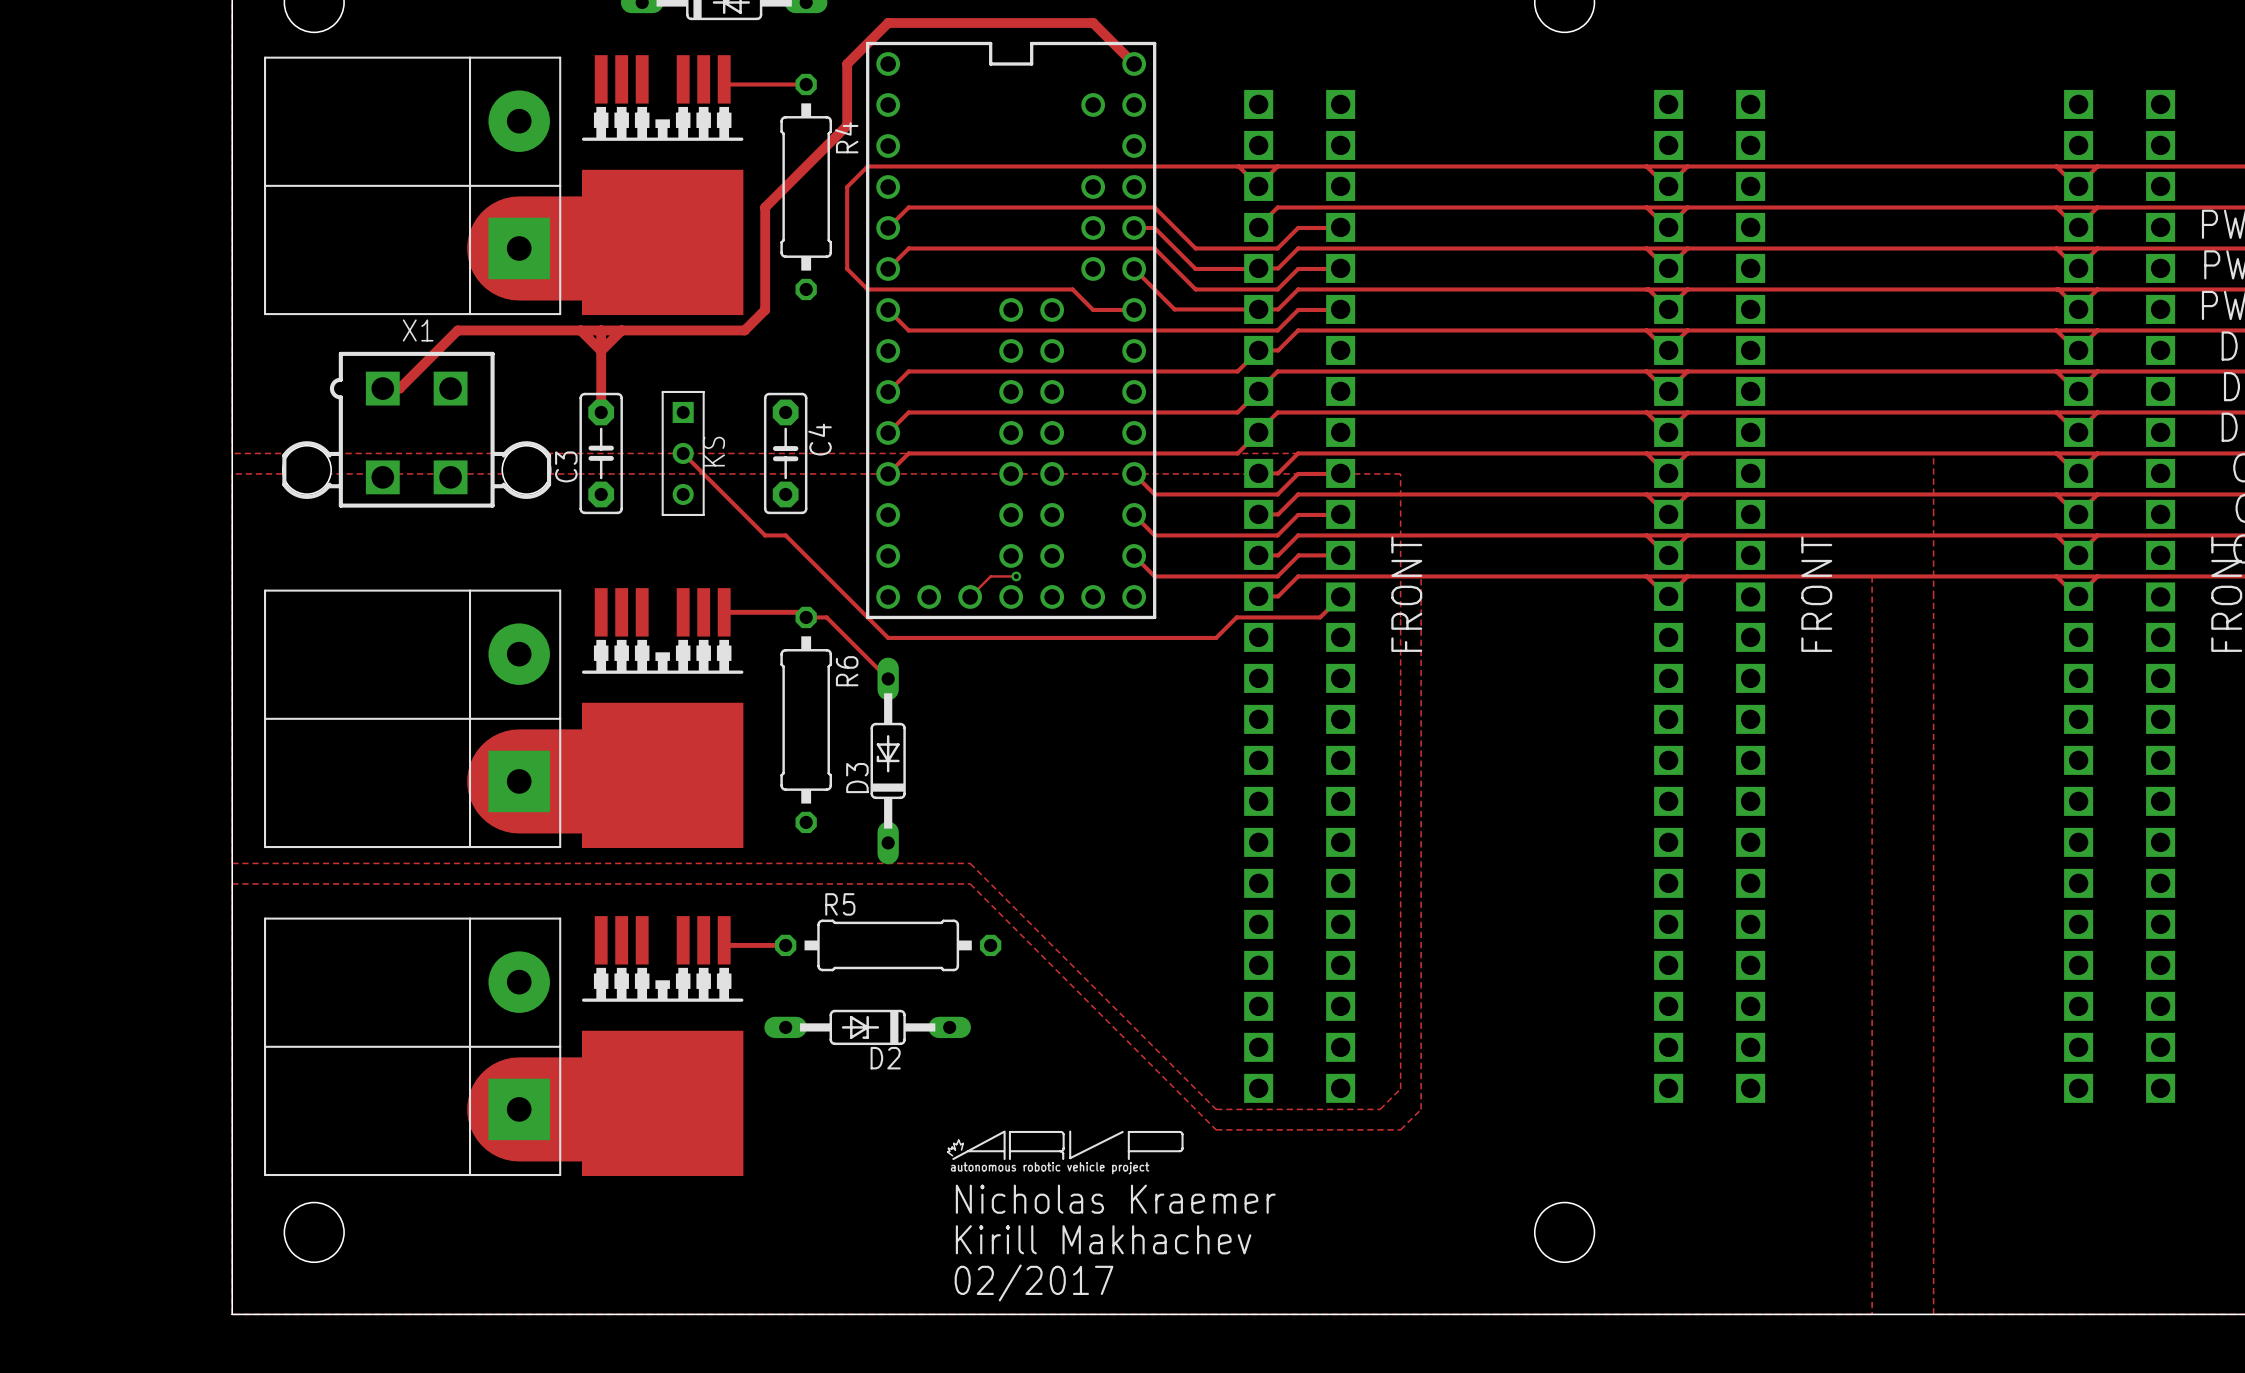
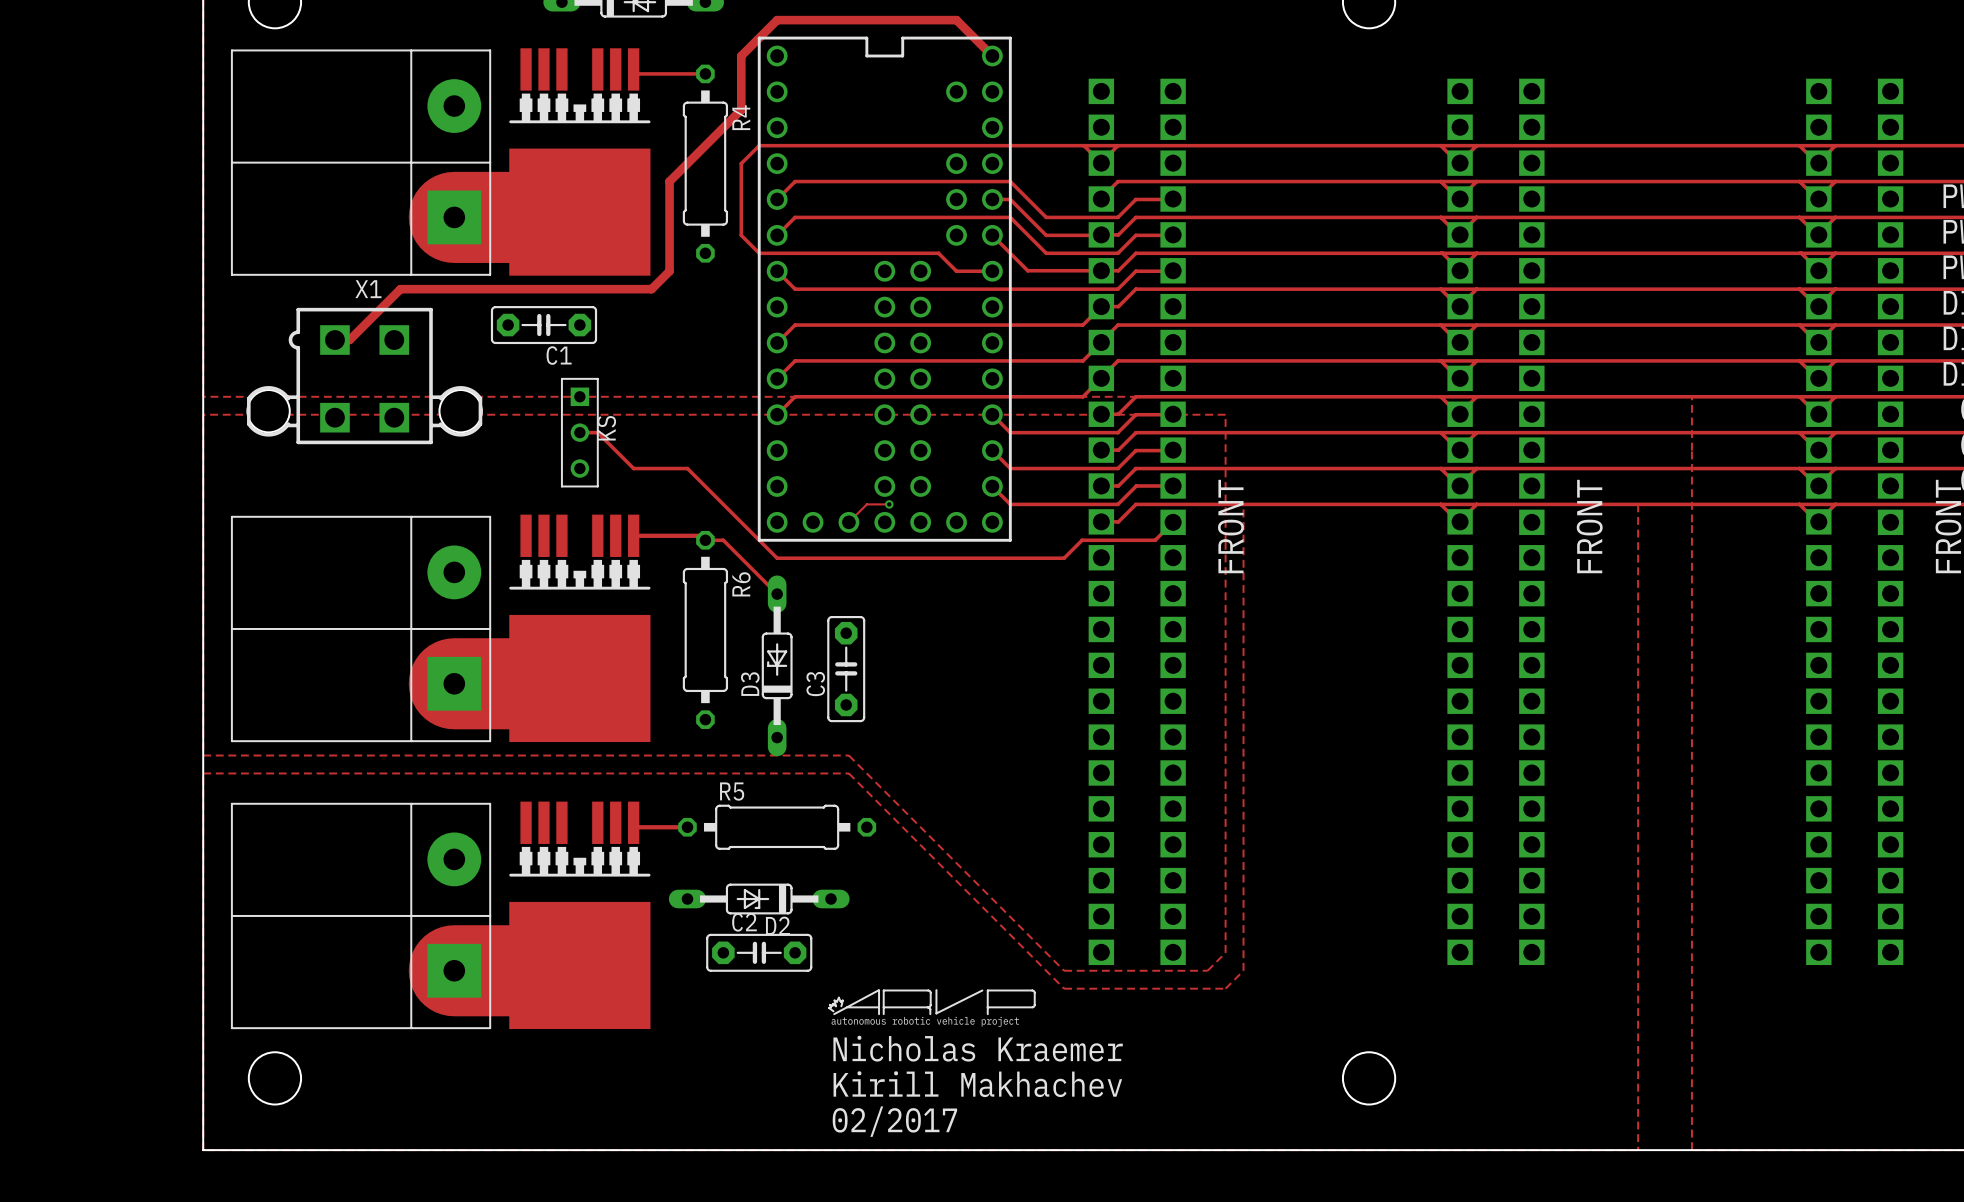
track: (580, 330) (601, 350) (621, 330) -> none
track: (601, 330) (601, 412) -> none
C1: none -> (543, 325)
C3 position: (601, 453) -> (846, 669)
track: (683, 453) (765, 535) -> (579, 432) (597, 432) (633, 468) (669, 468)
part position: (683, 453) -> (579, 432)
C4: (785, 453) -> none
C2: none -> (759, 952)

